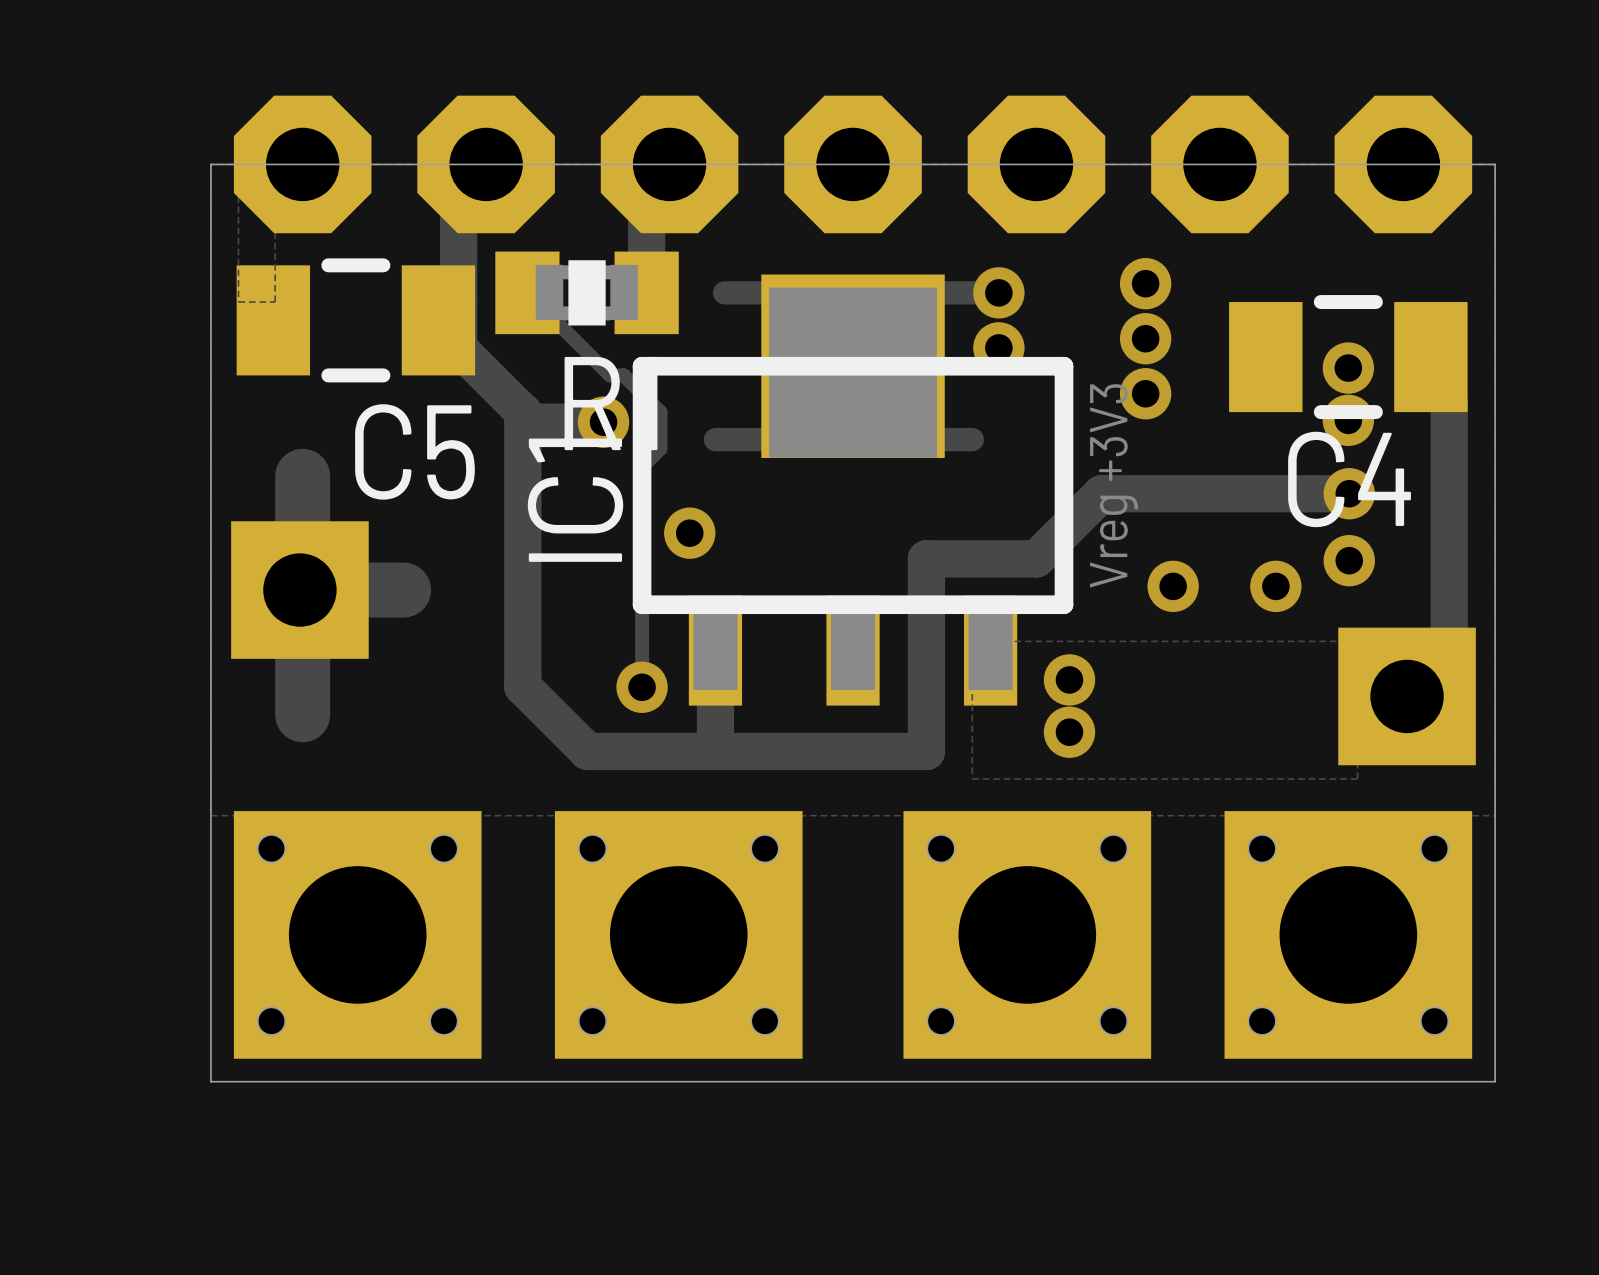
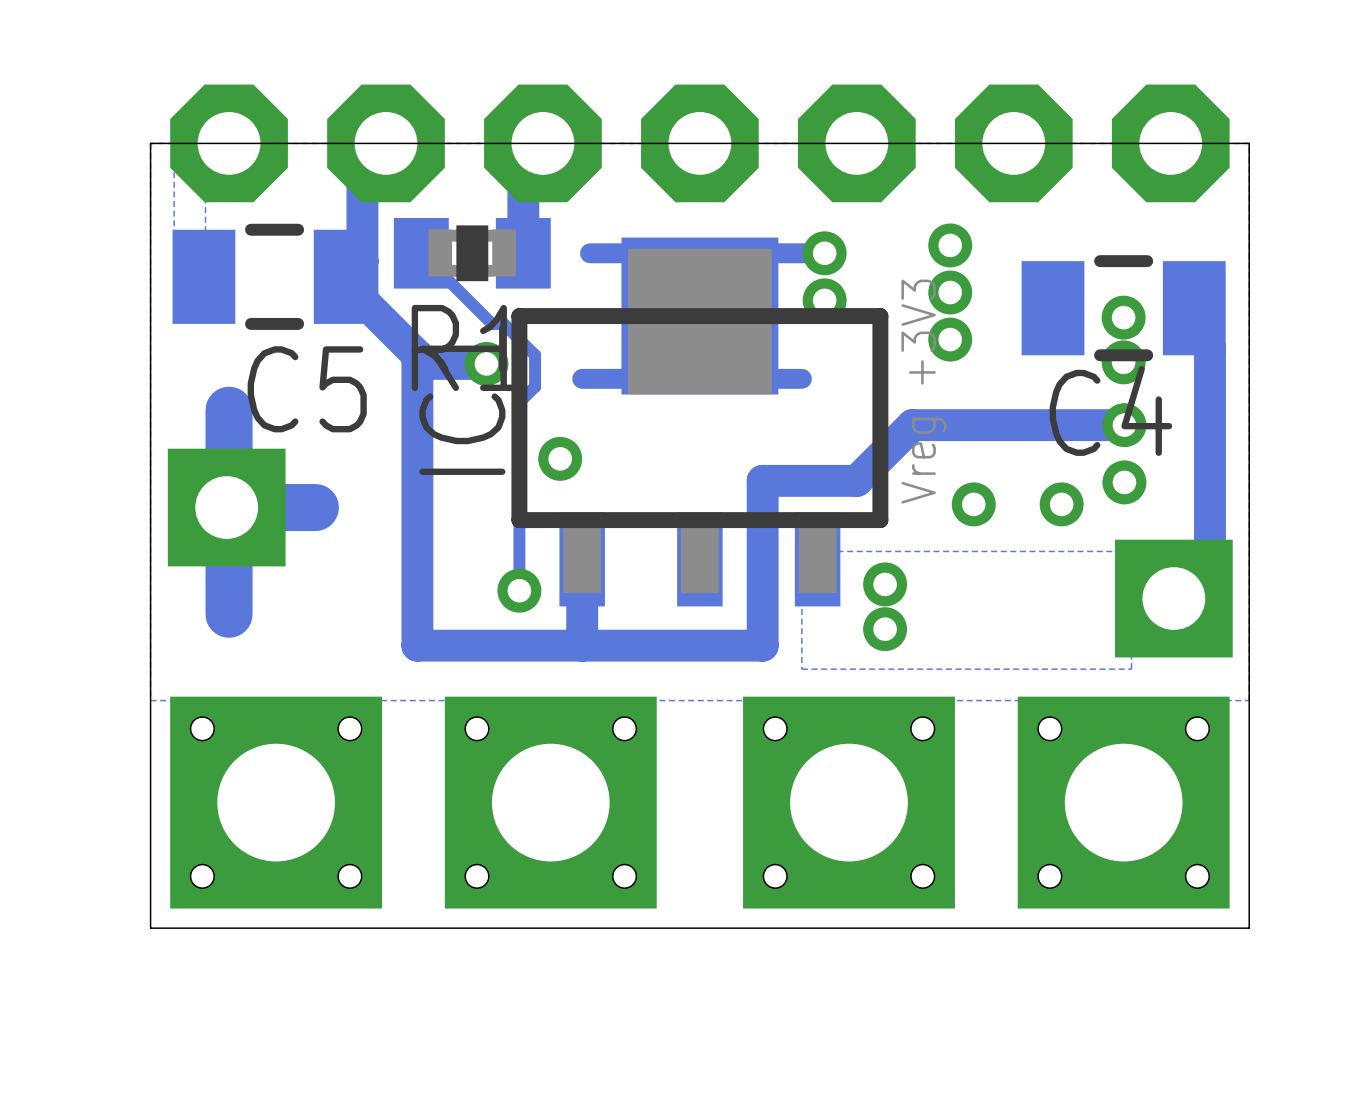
track: (522, 686) (587, 751) -> (417, 590) (417, 645) (472, 645)

